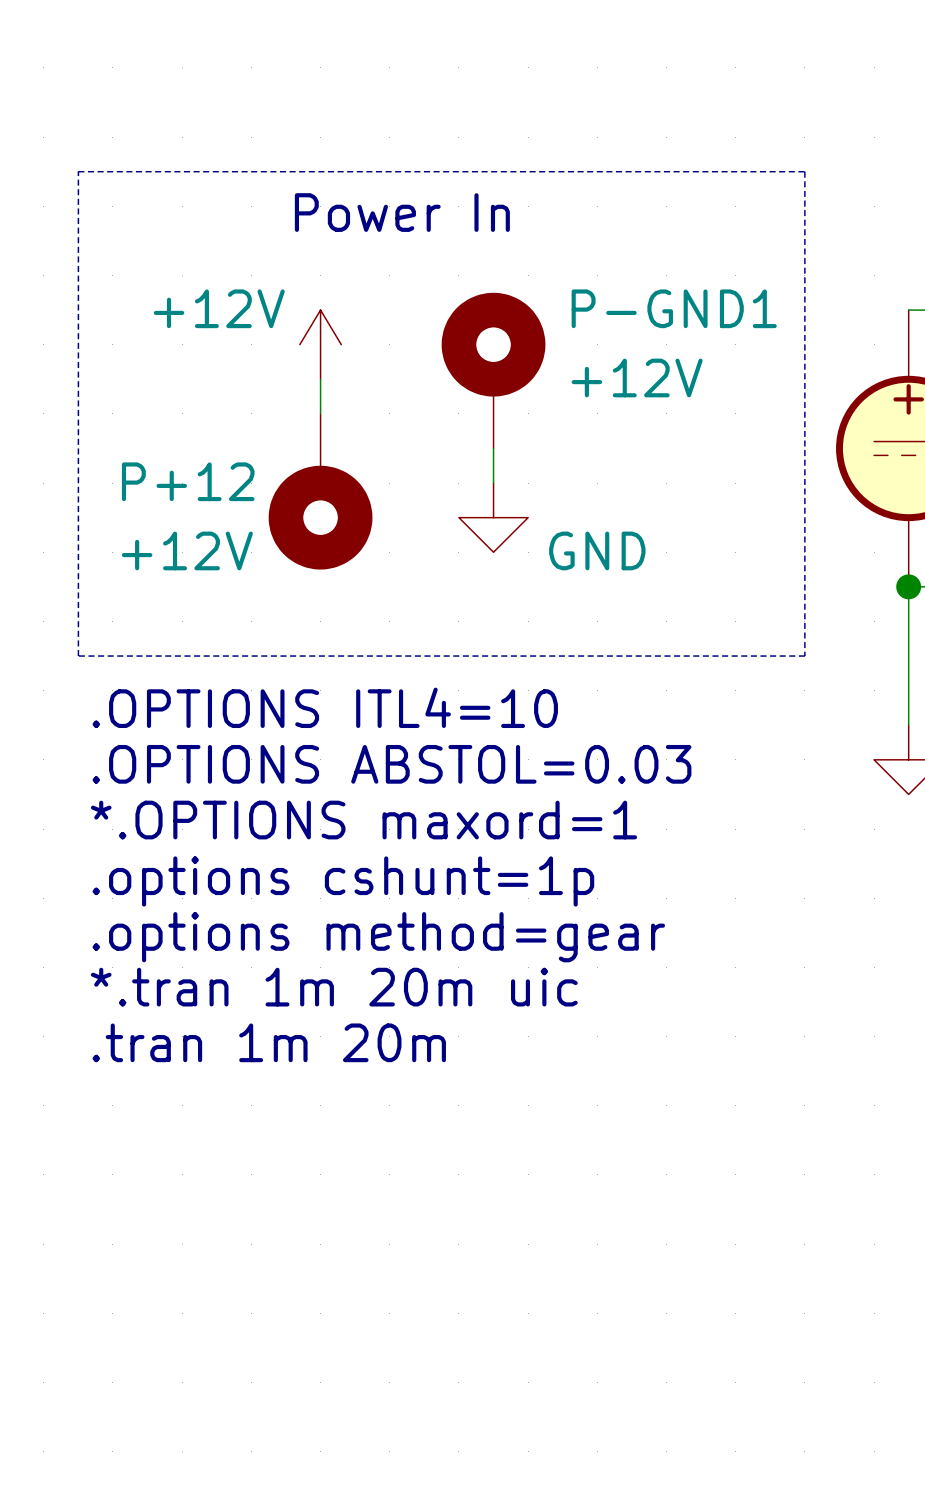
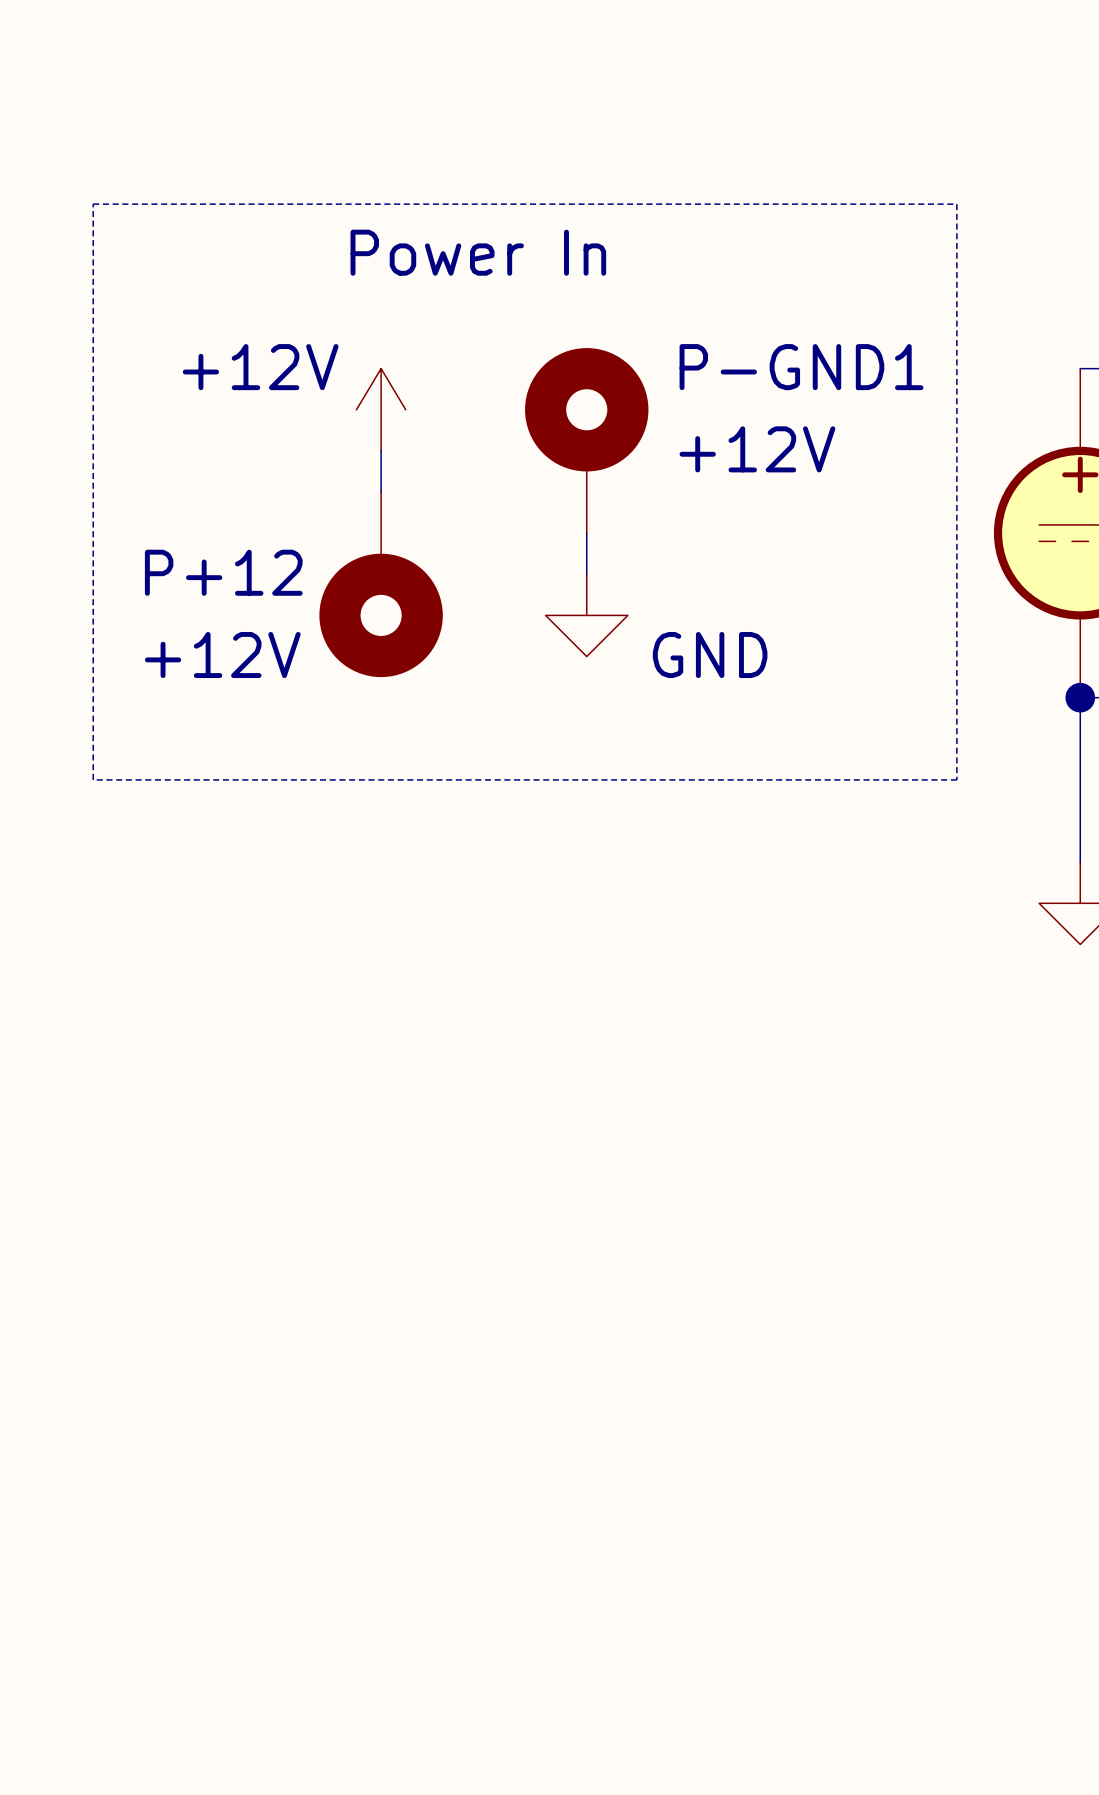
text: .OPTIONS ITL4=10 (325, 707) -> none
text: .OPTIONS ABSTOL=0.03 (391, 764) -> none
text: *.OPTIONS maxord=1 (363, 820) -> none
text: .options cshunt=1p (343, 881) -> none
text: .options method=gear (378, 937) -> none
text: *.tran 1m 20m uic (334, 987) -> none
text: .tran 1m 20m (269, 1042) -> none

